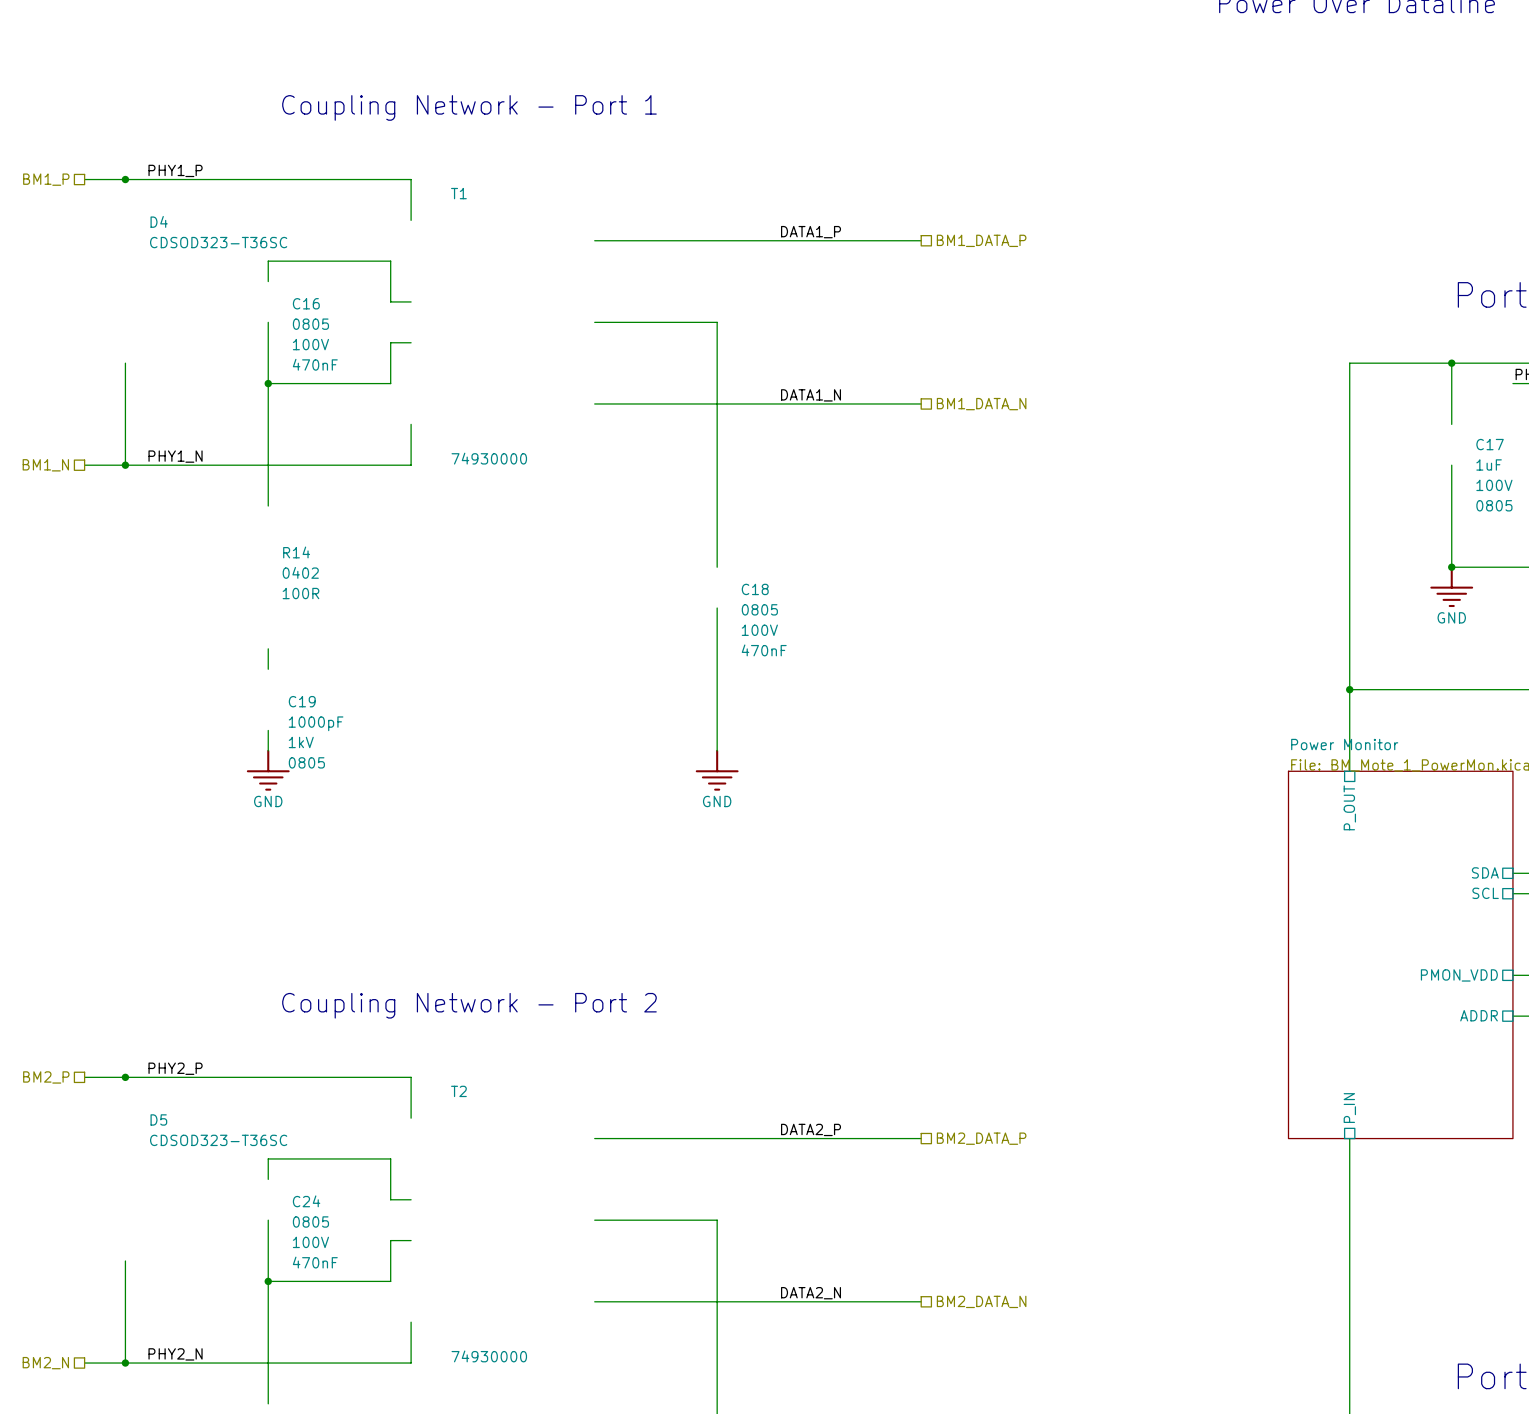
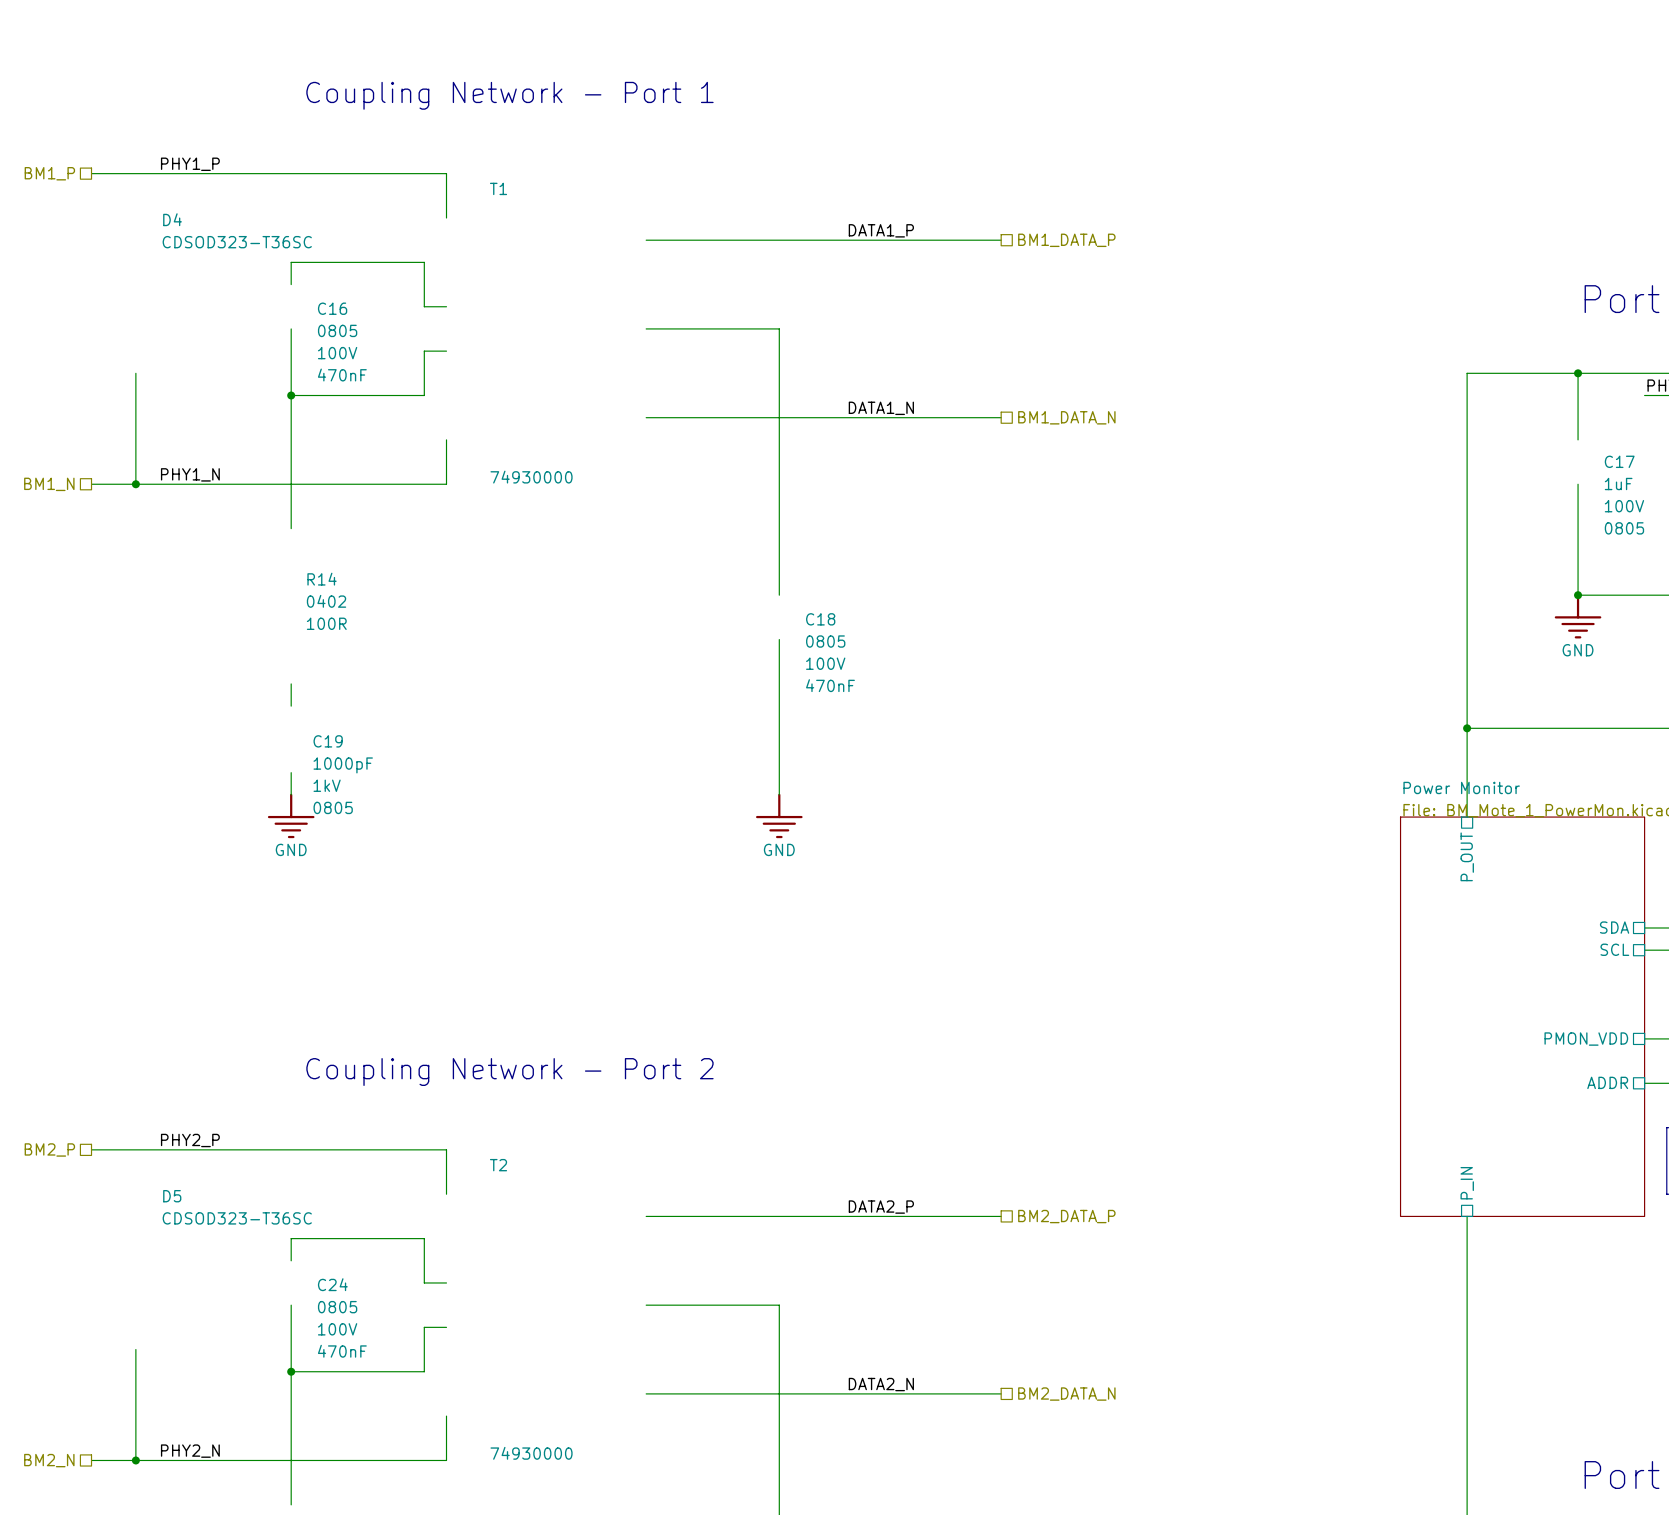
junction: (125, 179) -> none
junction: (125, 1077) -> none

